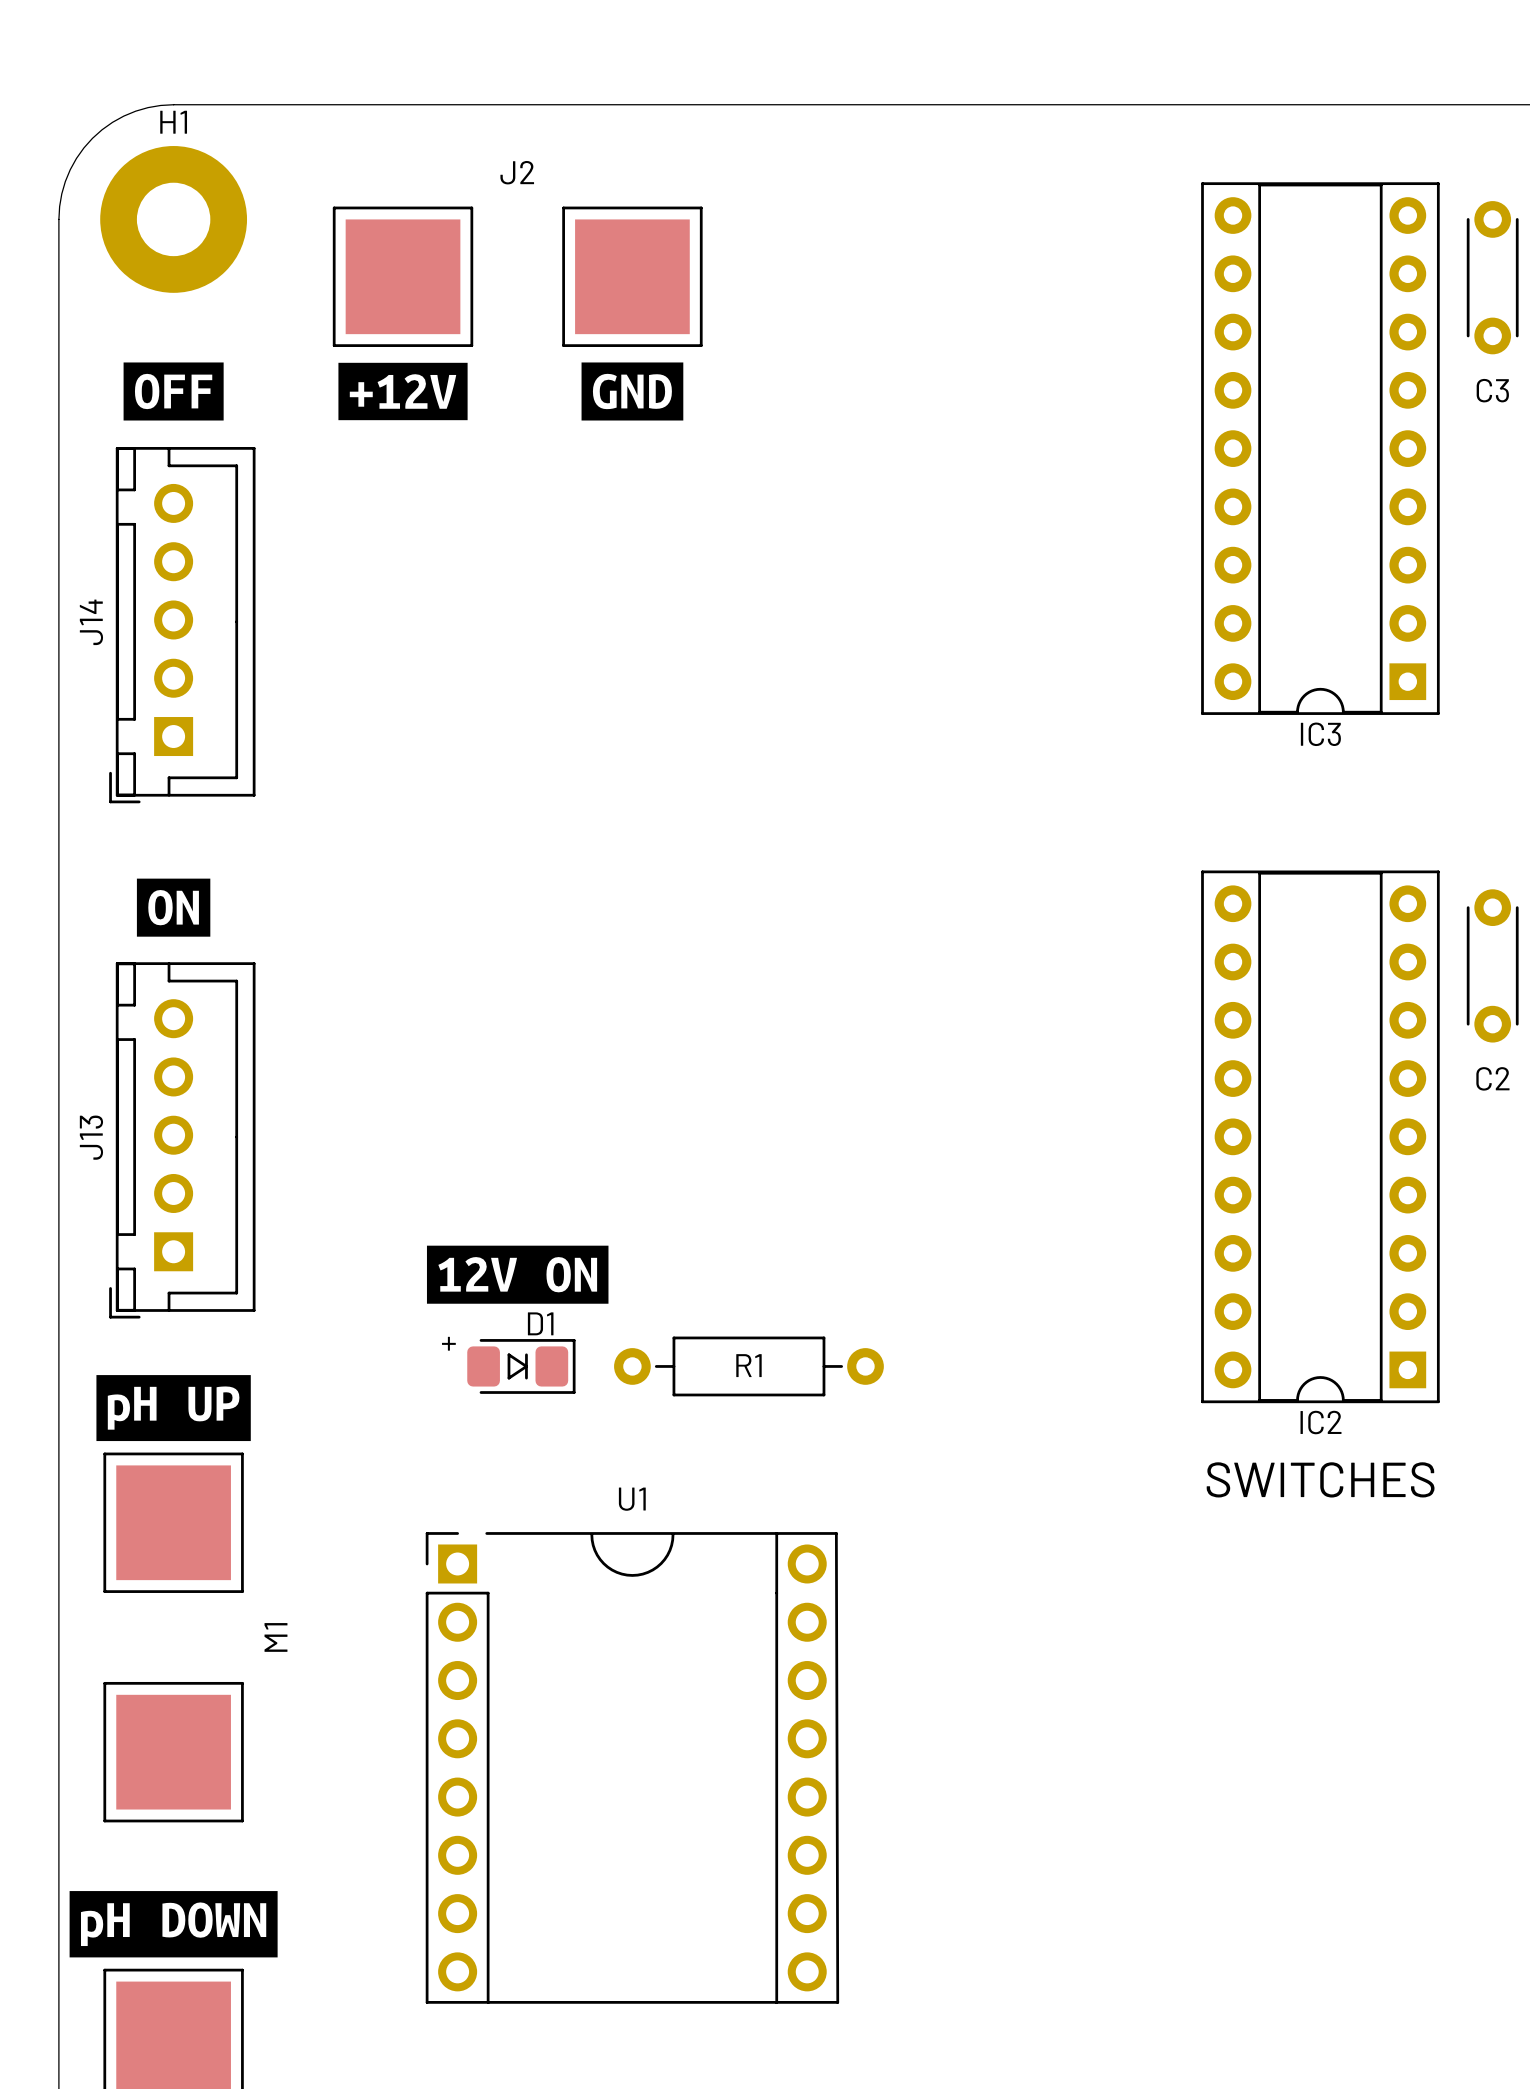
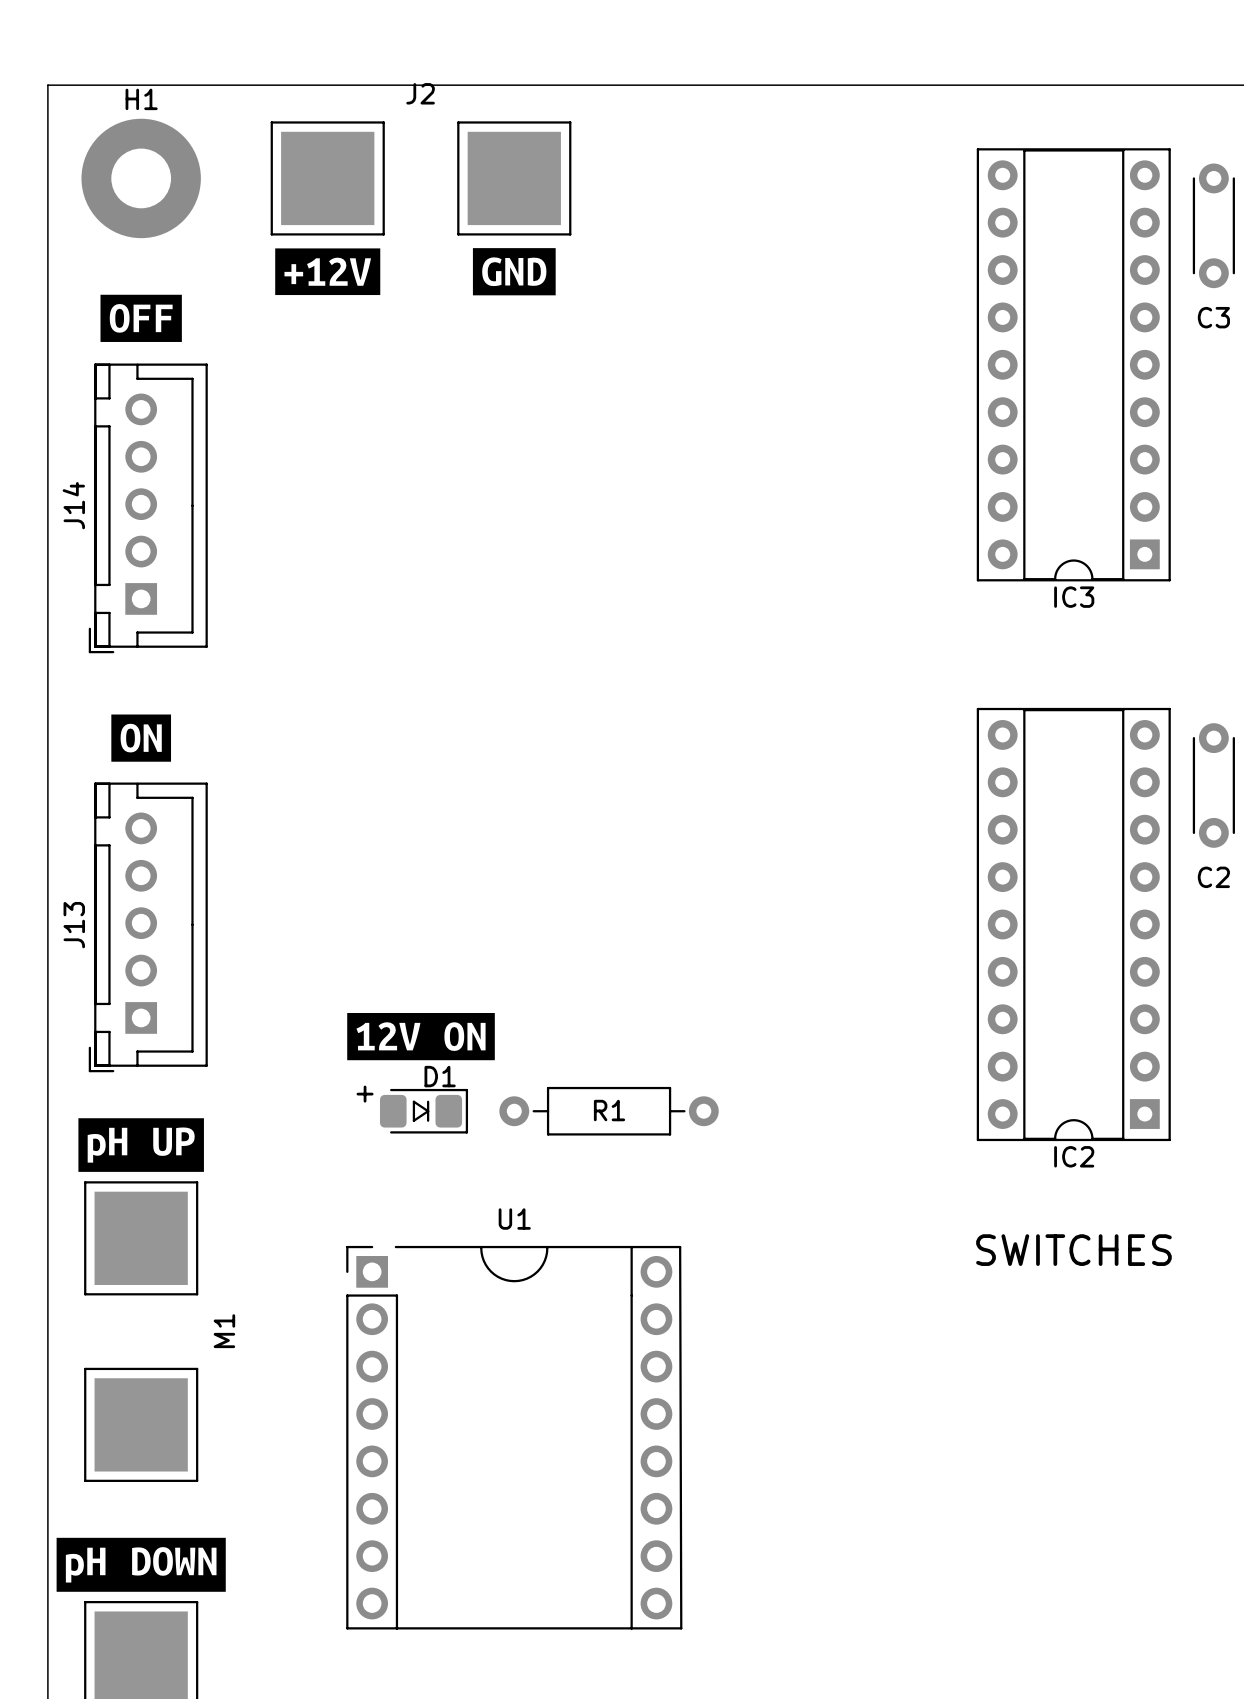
board edge: (173, 104) (135, 111) (112, 122) (92, 138) (76, 158) (65, 181) (58, 219) -> (141, 85) (47, 85) (47, 178)
J2 position: (517, 276) -> (421, 178)
drawing position: (403, 391) -> (327, 271)
drawing position: (632, 391) -> (514, 271)
text position: SWITCHES (1320, 1479) -> SWITCHES (1073, 1250)

